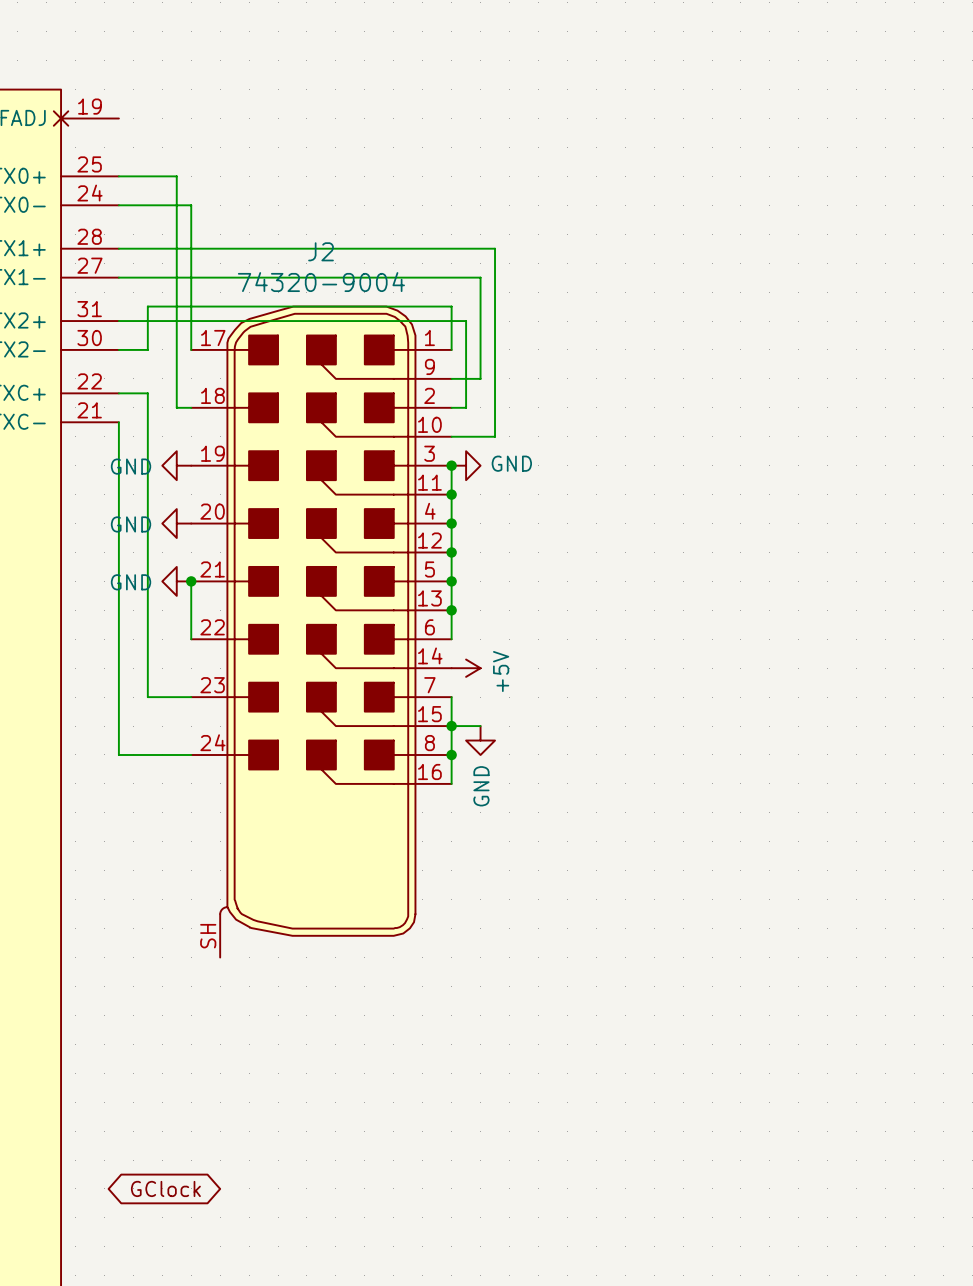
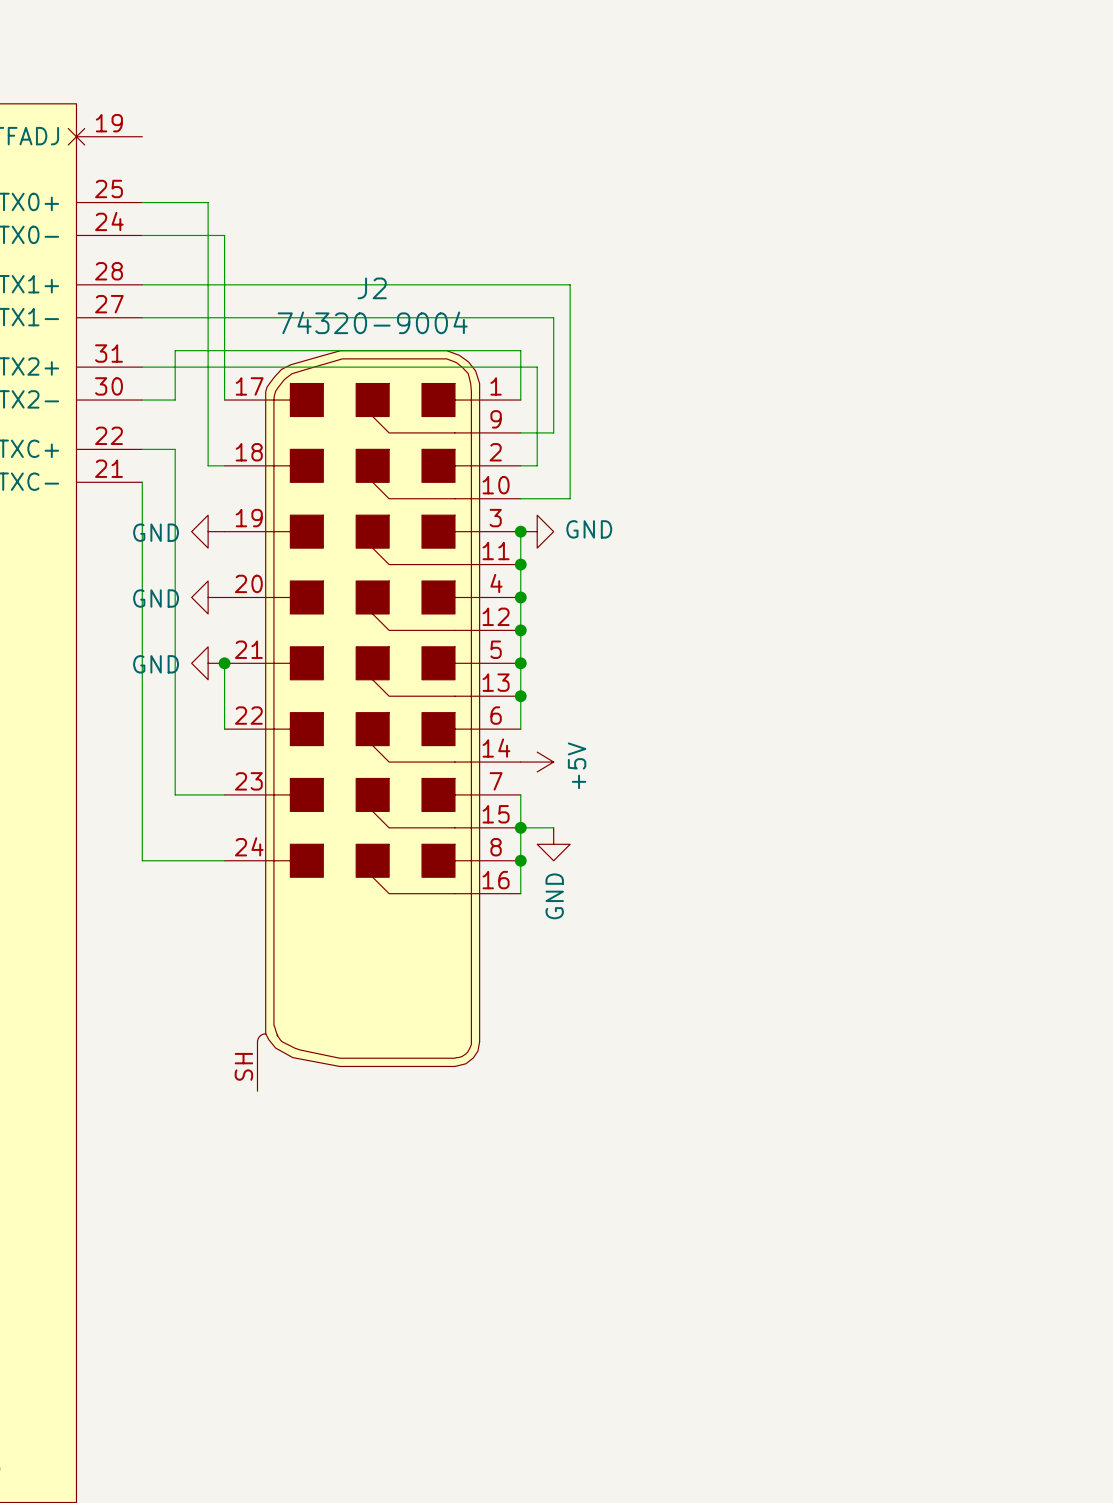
global label: GClock (165, 1188) -> none

